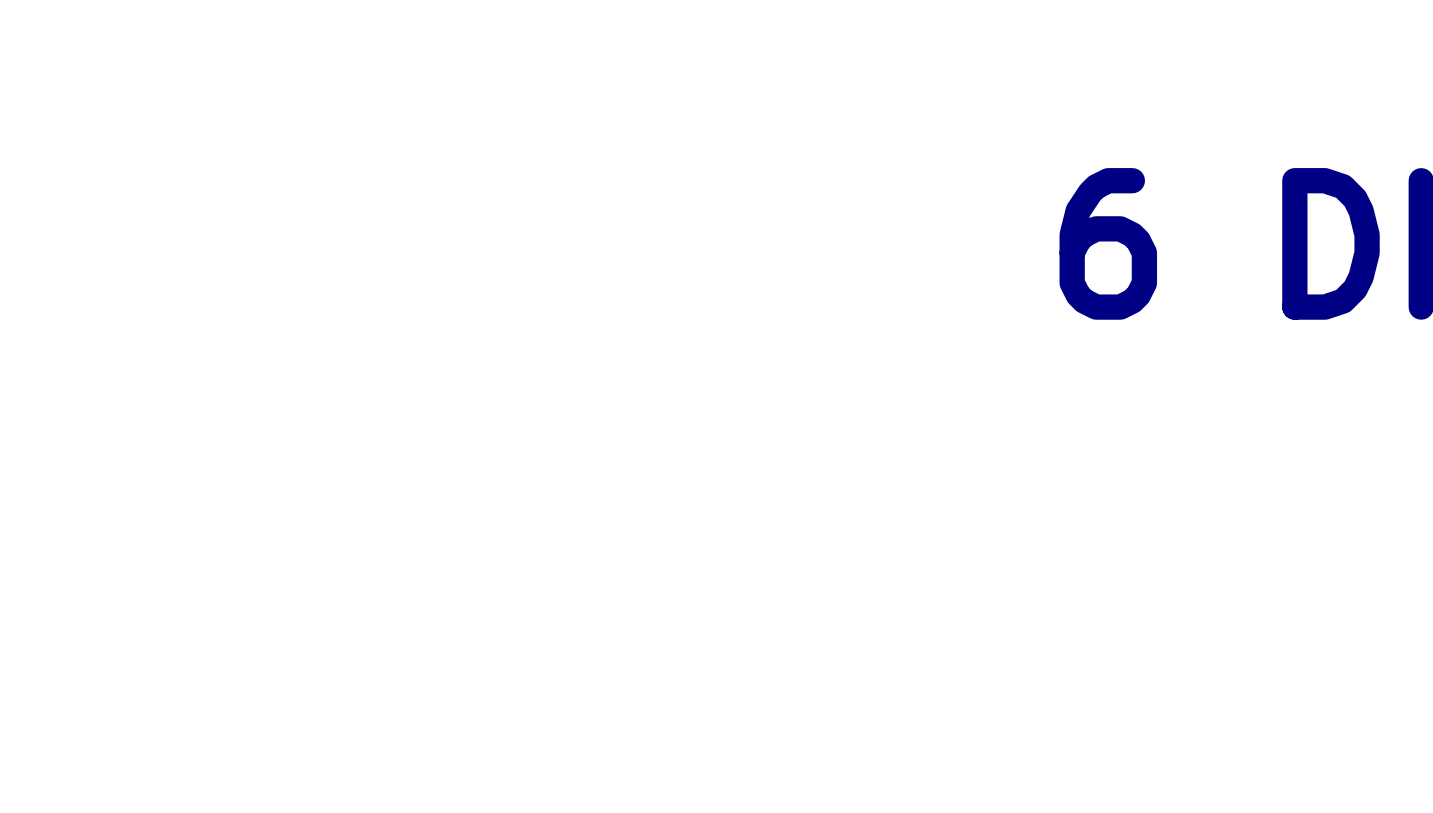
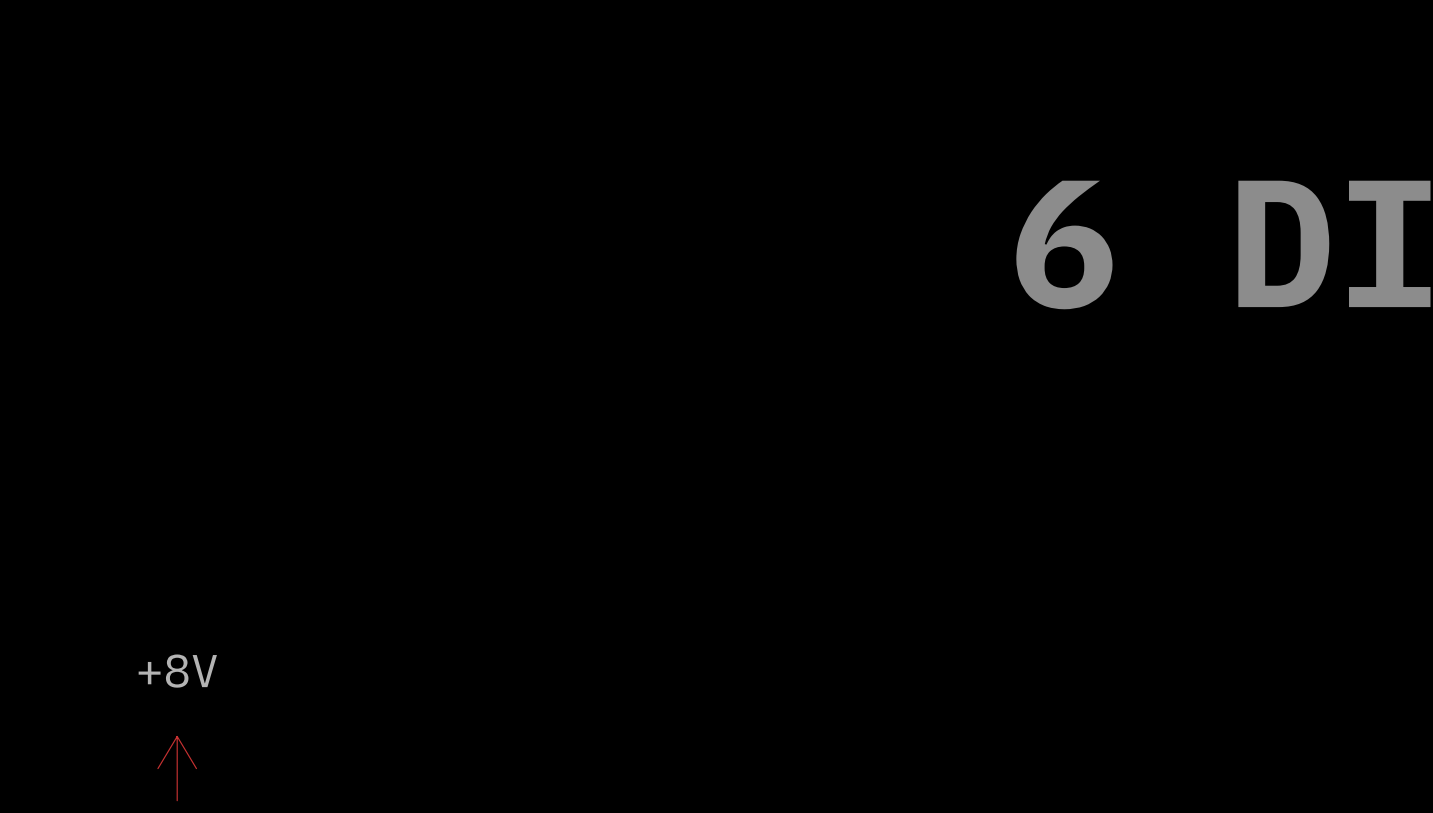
power symbol: none -> +8V (177, 768)

